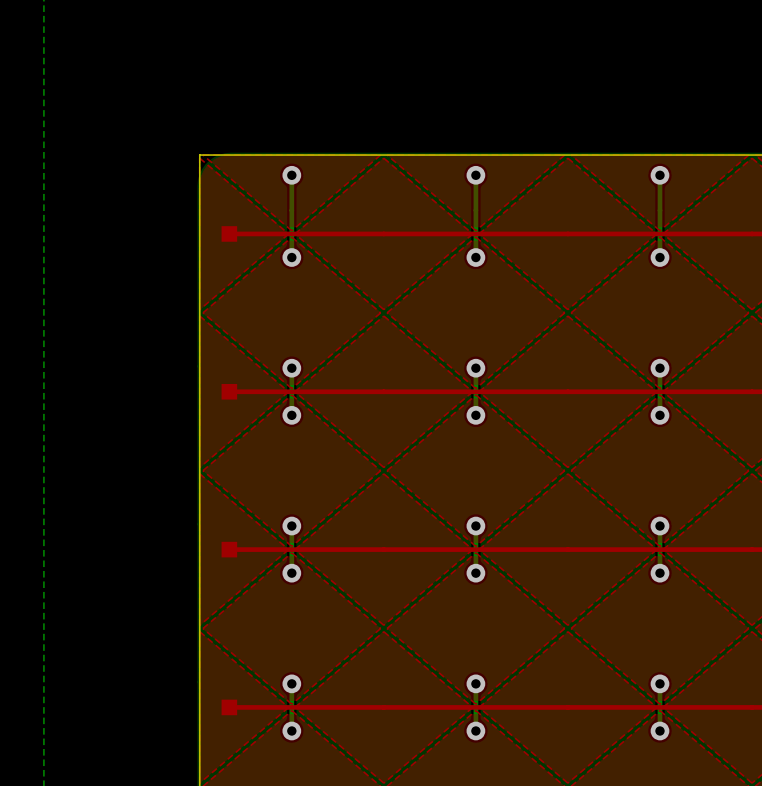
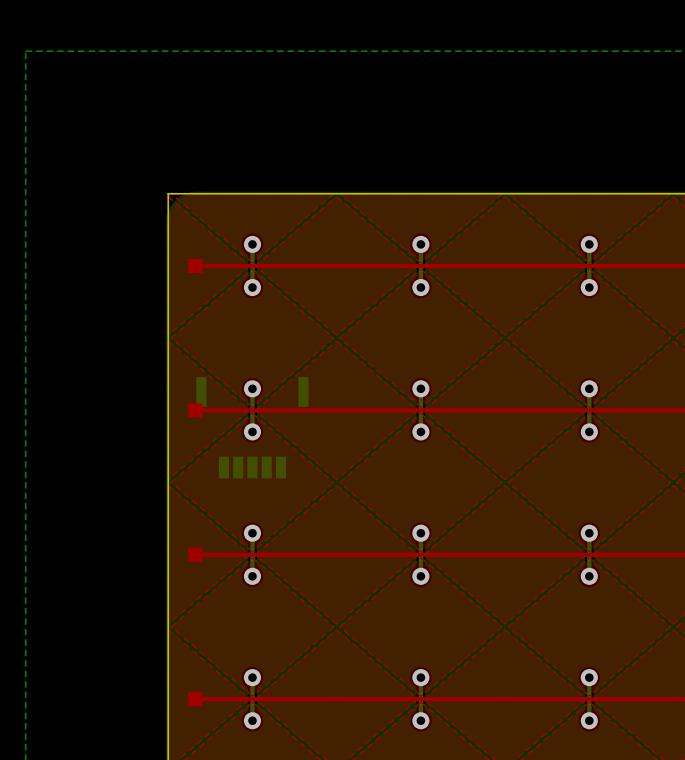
bottom track: (291, 175) (291, 210) -> none
via position: (291, 175) -> (252, 244)
bottom track: (475, 175) (475, 210) -> none
via position: (475, 175) -> (420, 244)
bottom track: (659, 175) (659, 210) -> none
via position: (659, 175) -> (589, 244)
part: none -> (252, 427)

